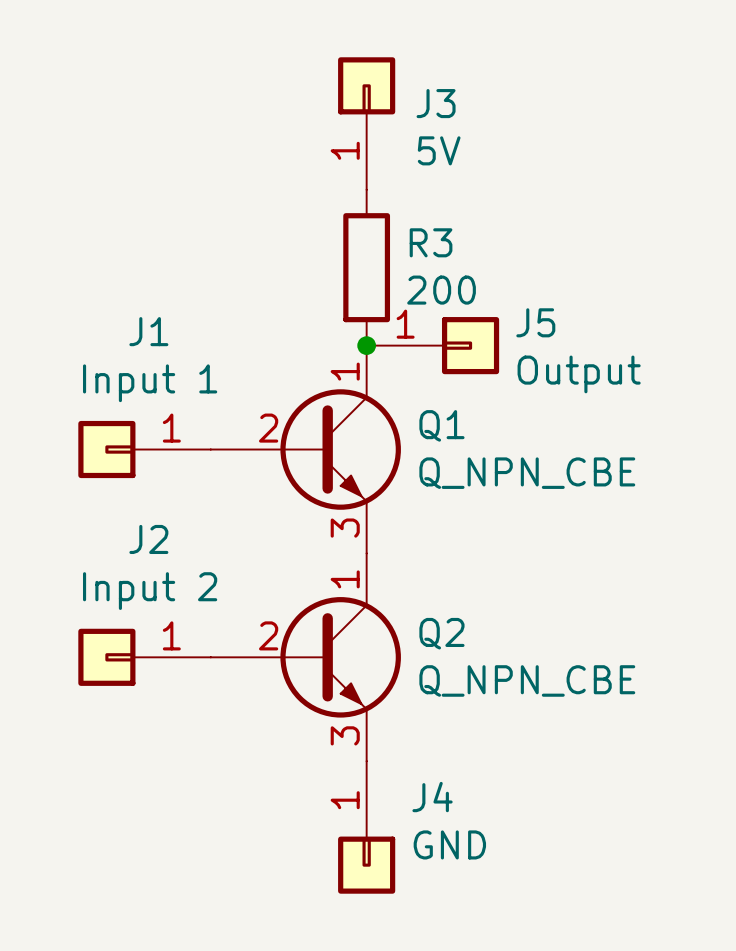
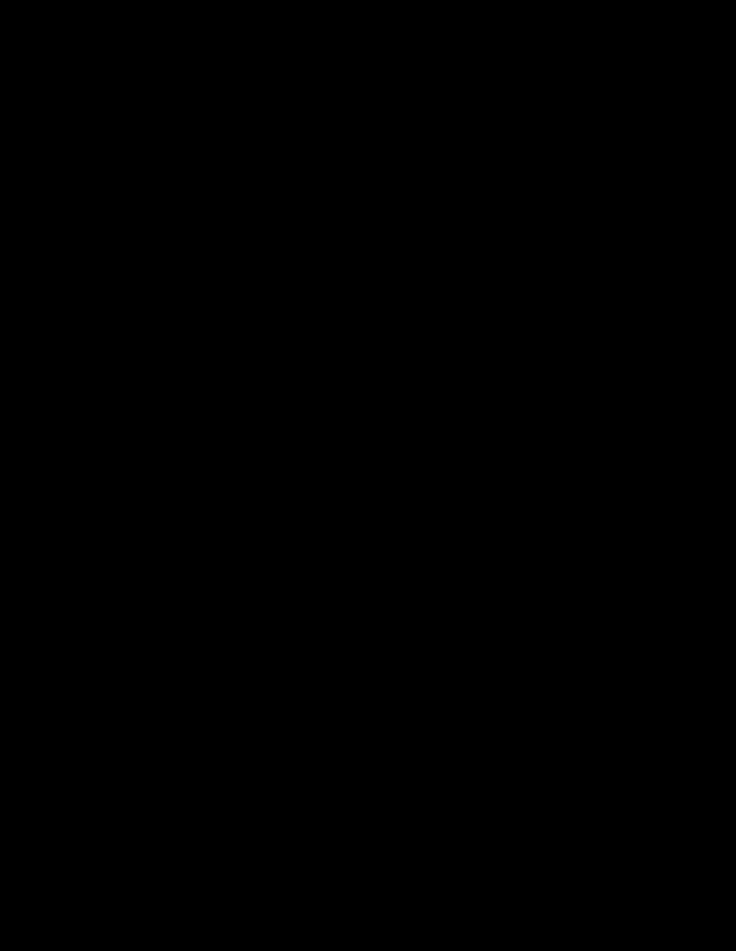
J3: 5V (366, 123) -> none
R3: 200 (366, 267) -> none
junction: (366, 345) -> none
J5: Output (432, 345) -> none
J1: Input 1 (144, 449) -> none
Q1: Q_NPN_CBE (305, 449) -> none
J2: Input 2 (144, 657) -> none
Q2: Q_NPN_CBE (305, 657) -> none
J4: GND (366, 827) -> none

